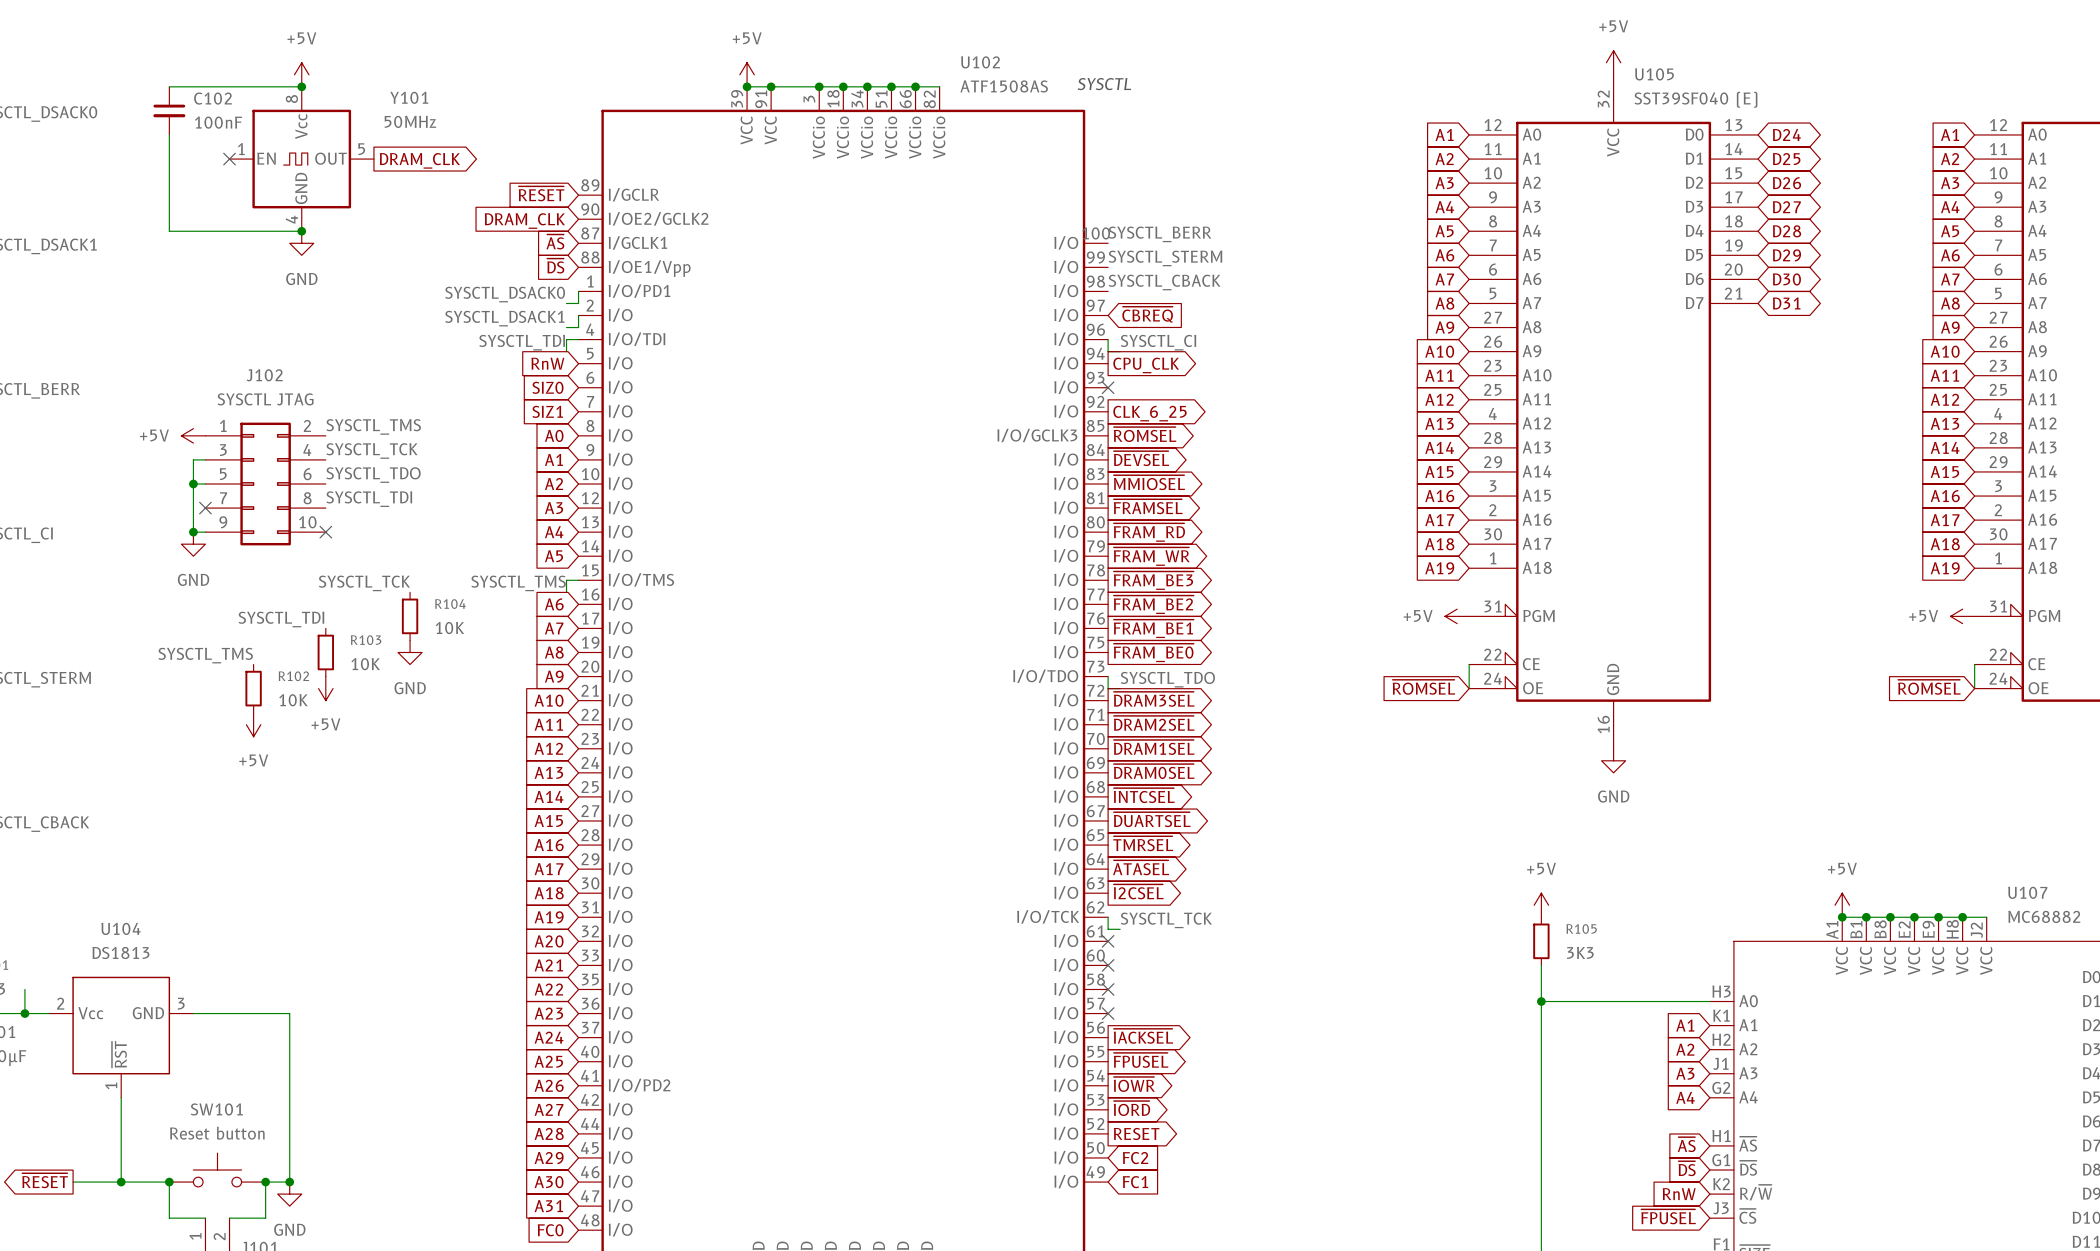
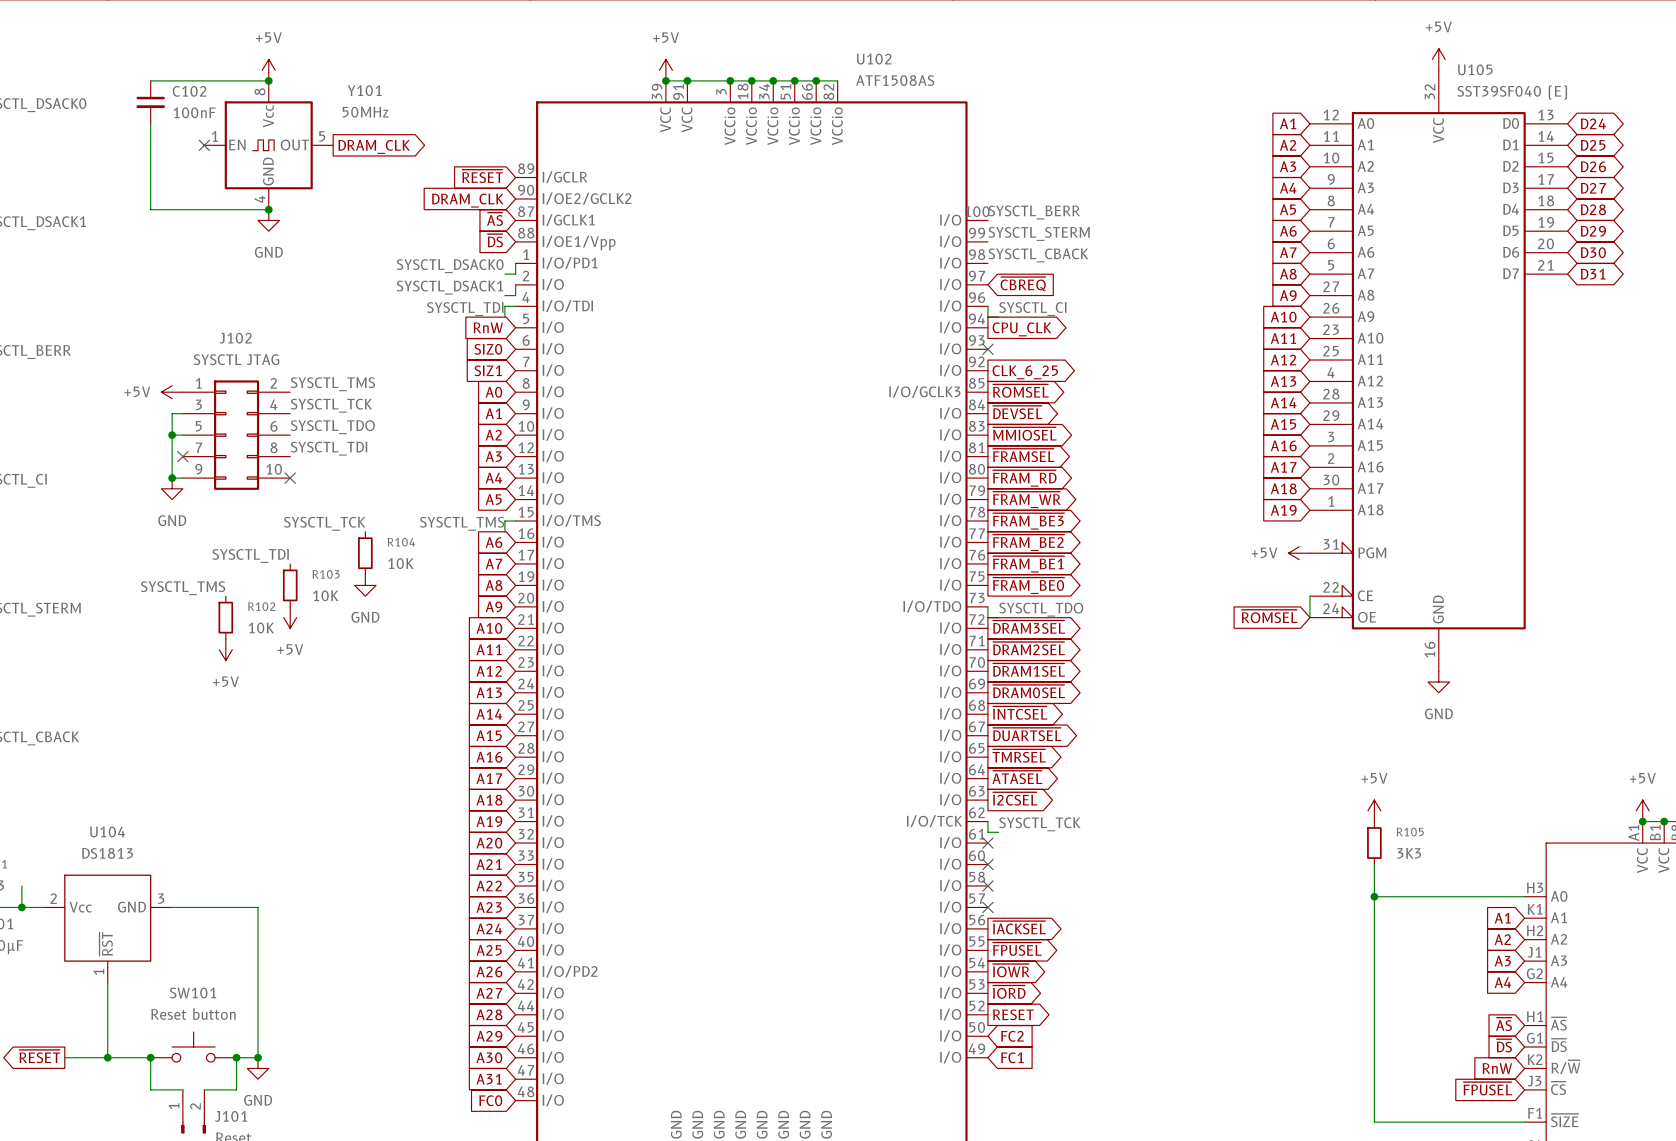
text: SYSCTL (1104, 84) -> none

